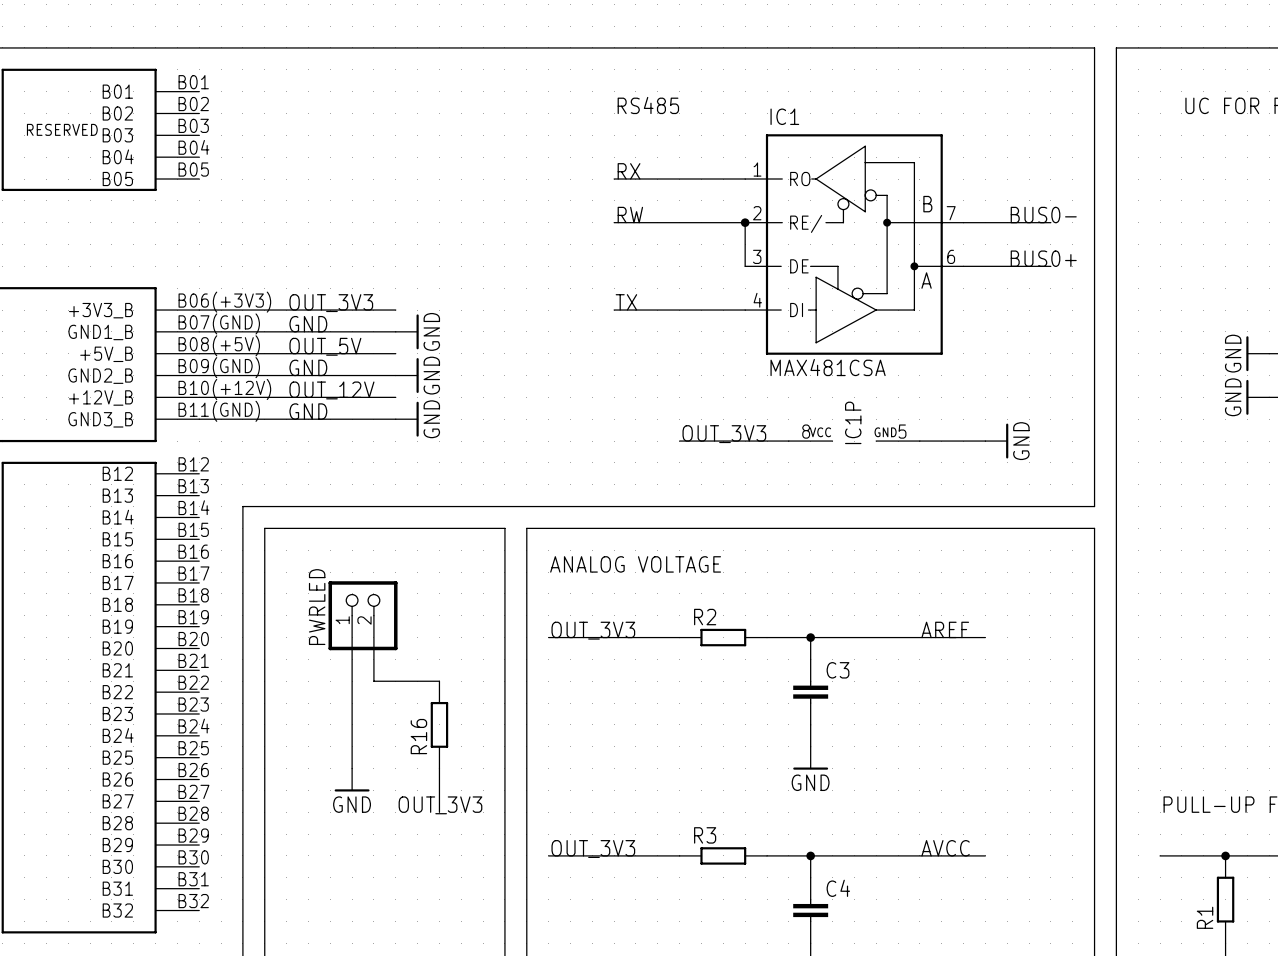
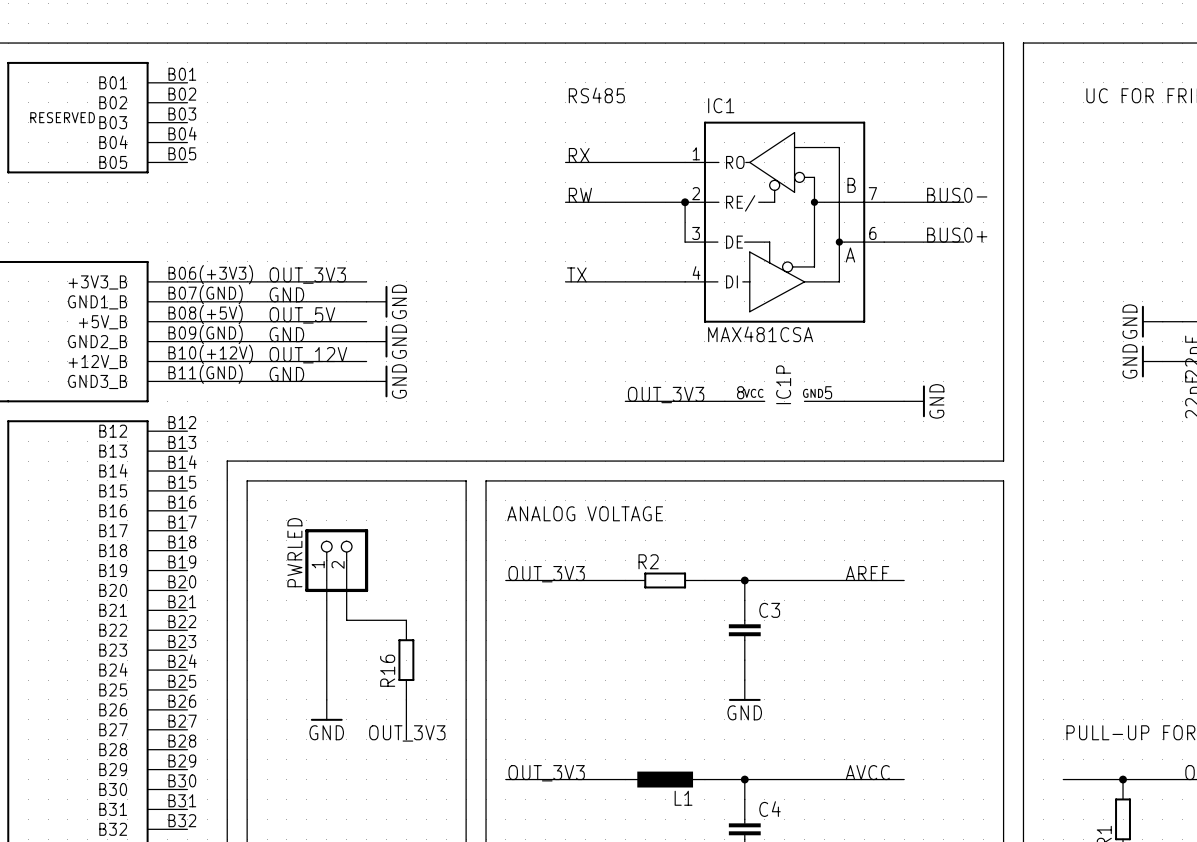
R3: (723, 855) -> none
L1: none -> (665, 779)

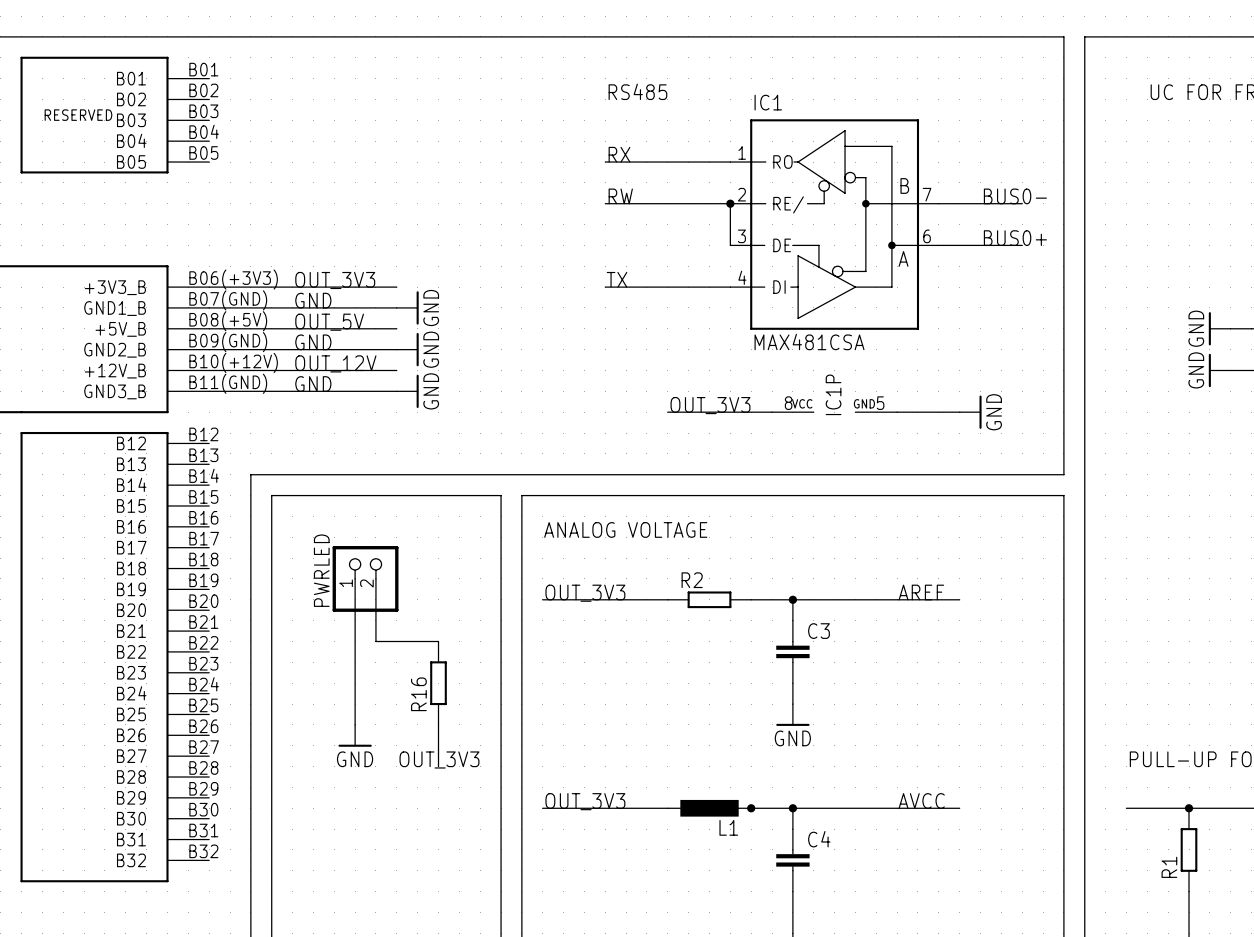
junction: none -> (751, 808)

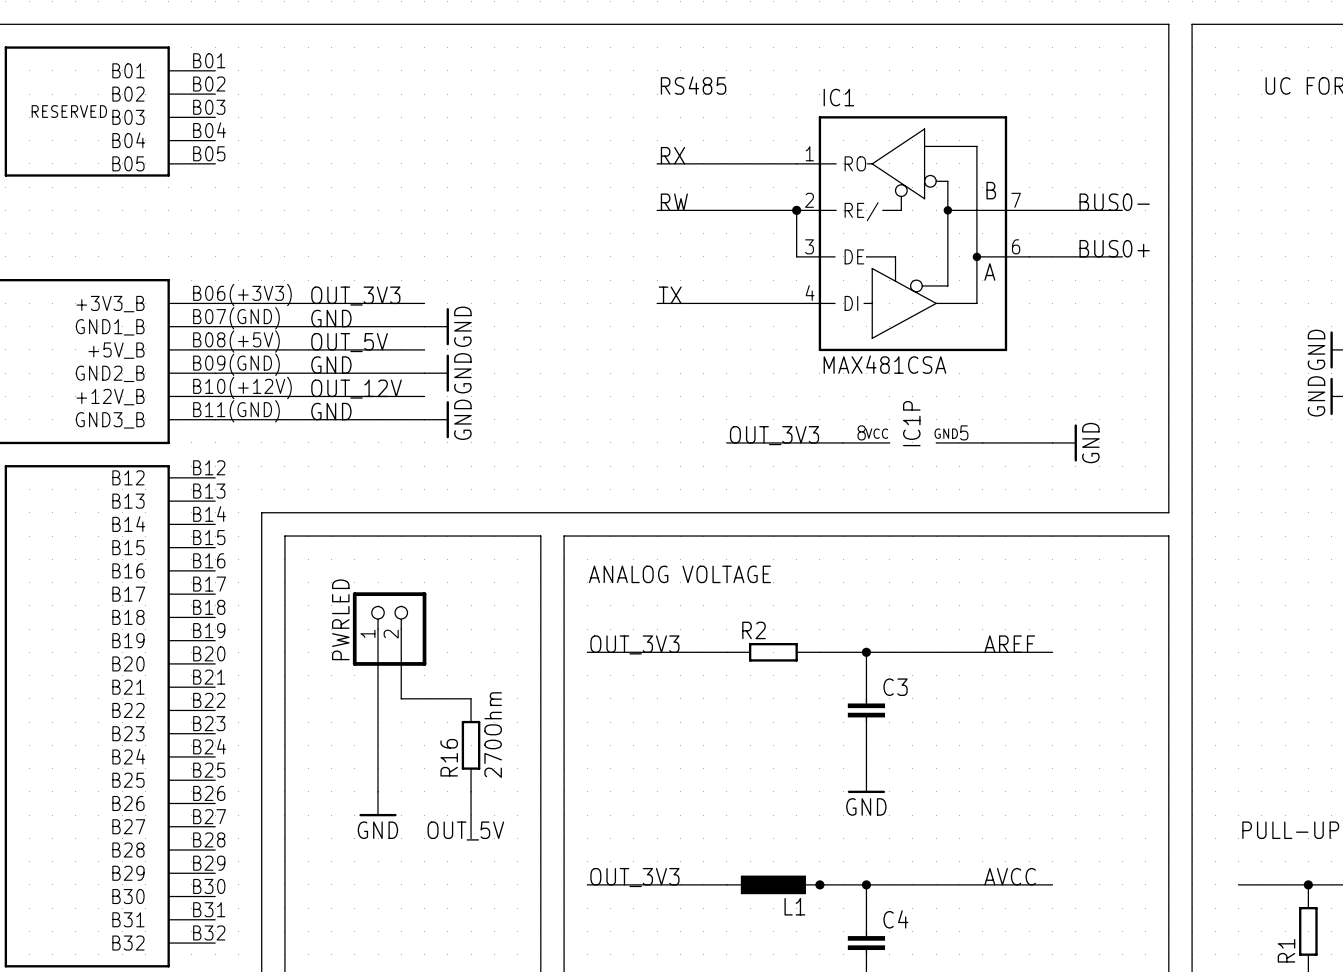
R16 value: none -> 270Ohm (493, 735)
label: OUT_3V3 (439, 759) -> OUT_5V (465, 831)

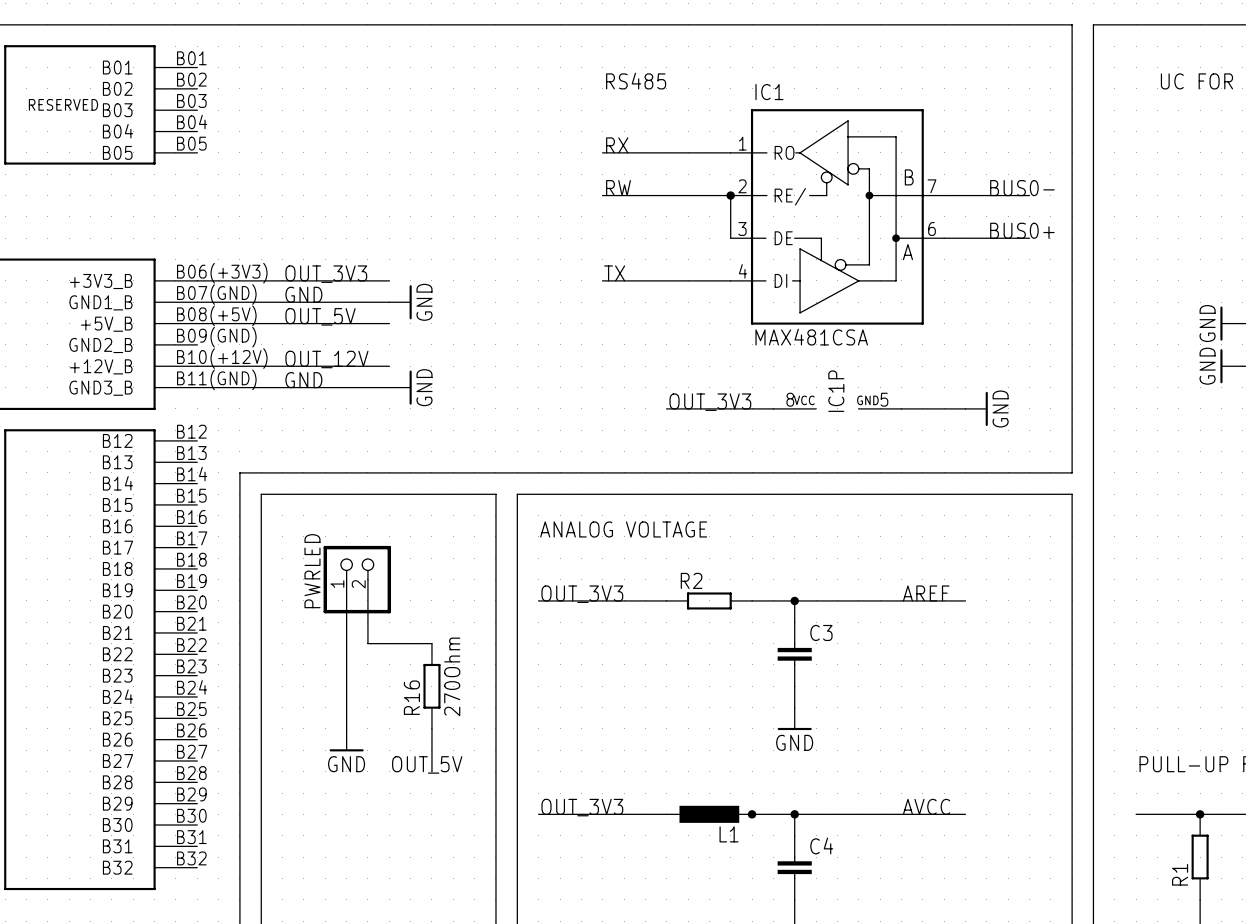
label: GND (331, 365) -> none
wire: (215, 373) (424, 373) -> none
power symbol: GND (436, 373) -> none

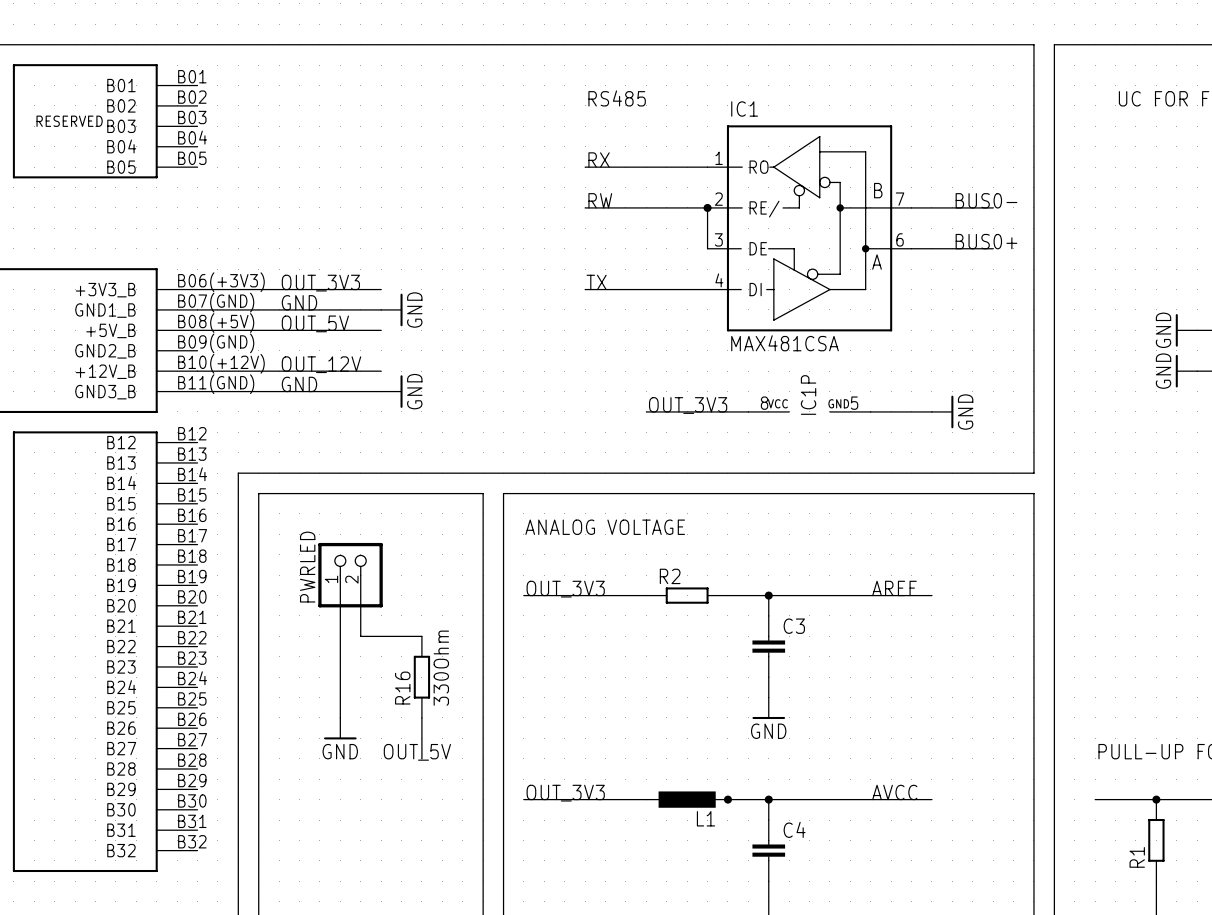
R16 value: 270Ohm (452, 676) -> 330Ohm (441, 668)

